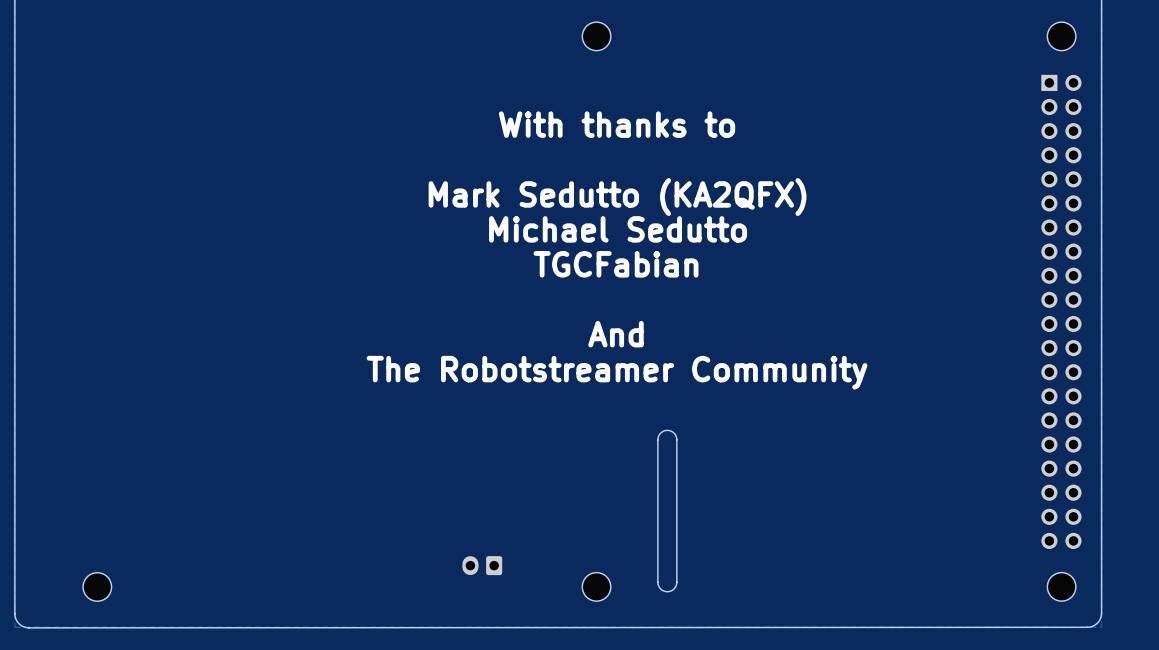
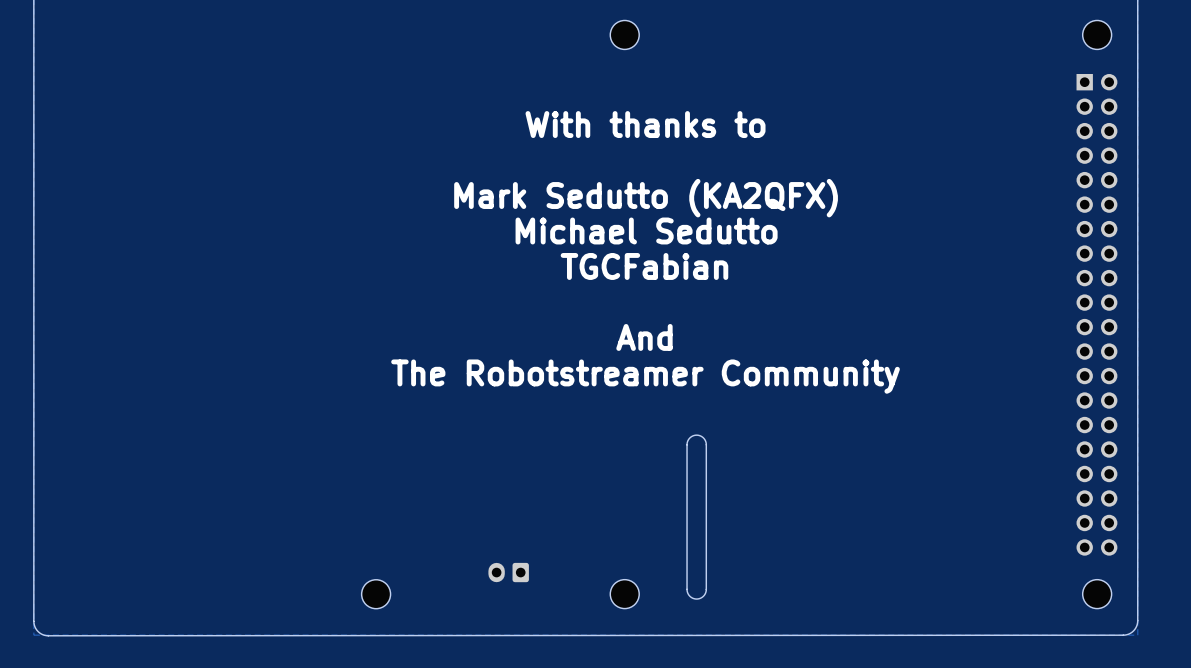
part: (97, 586) -> none
part: none -> (376, 594)

